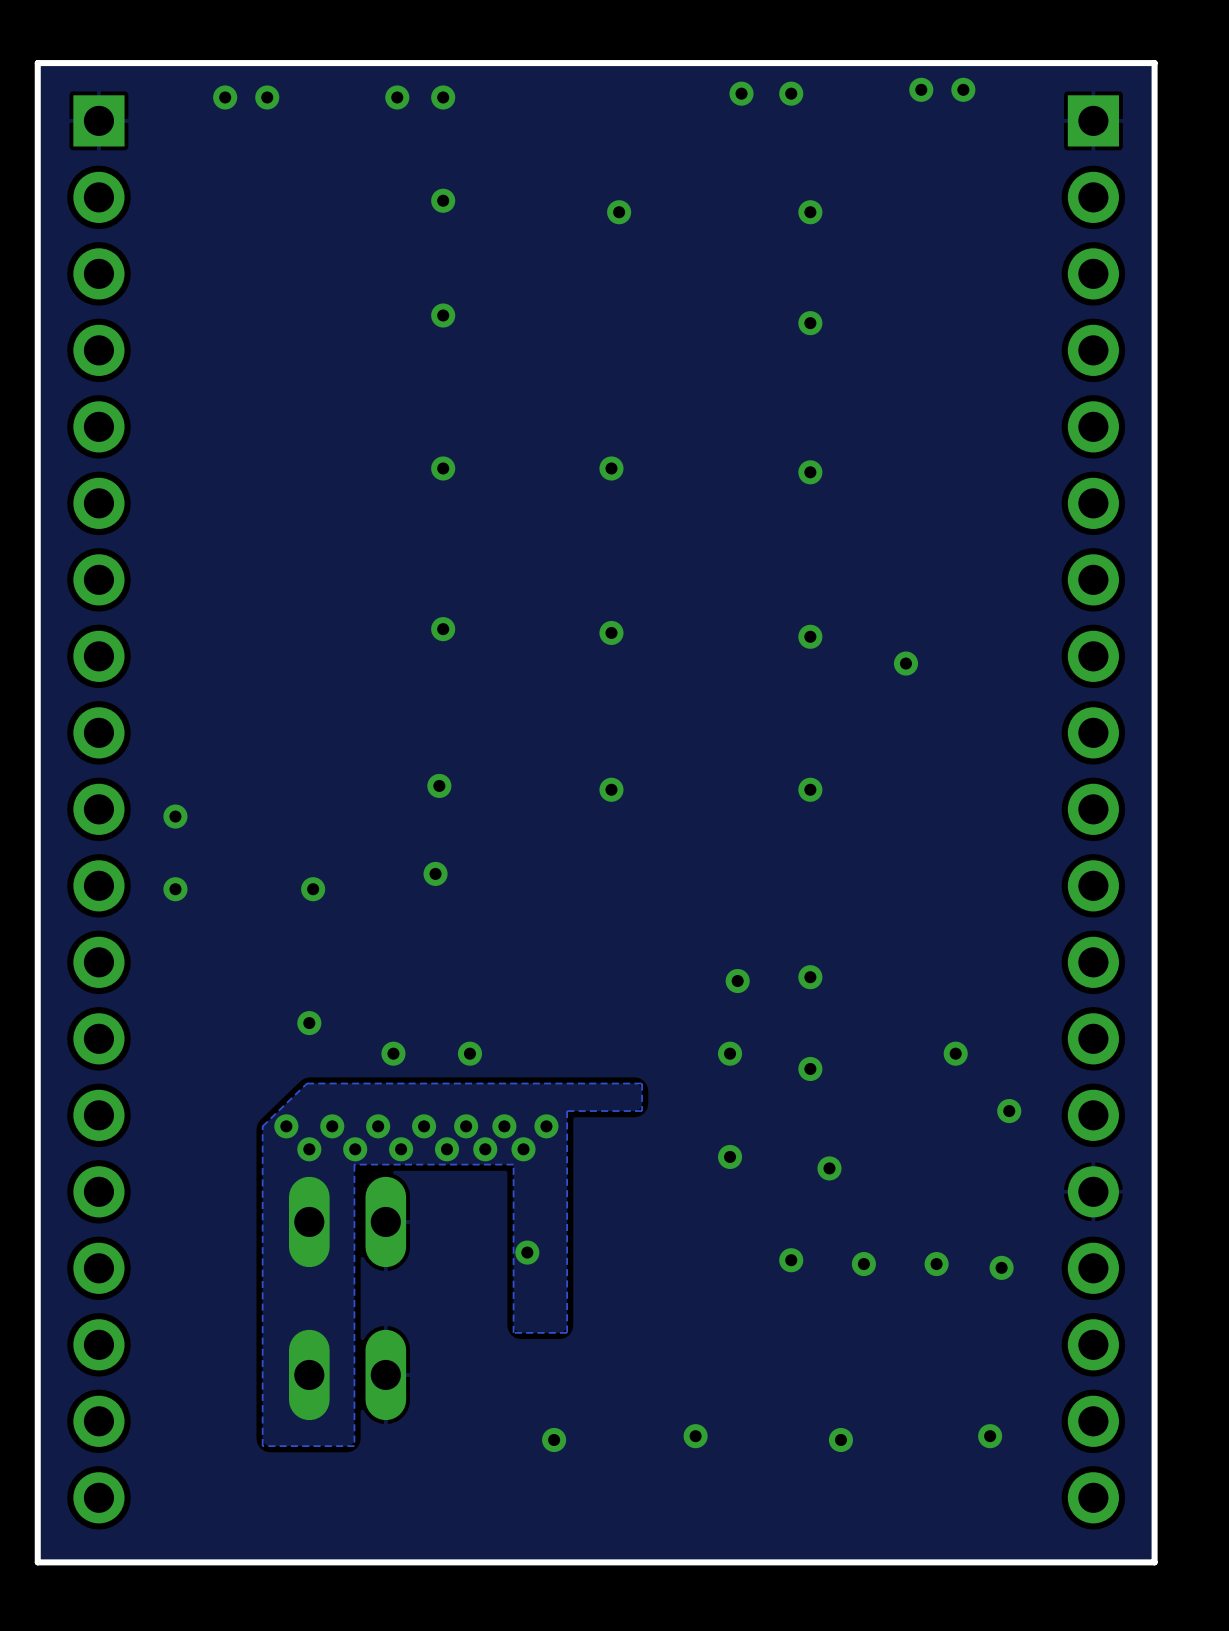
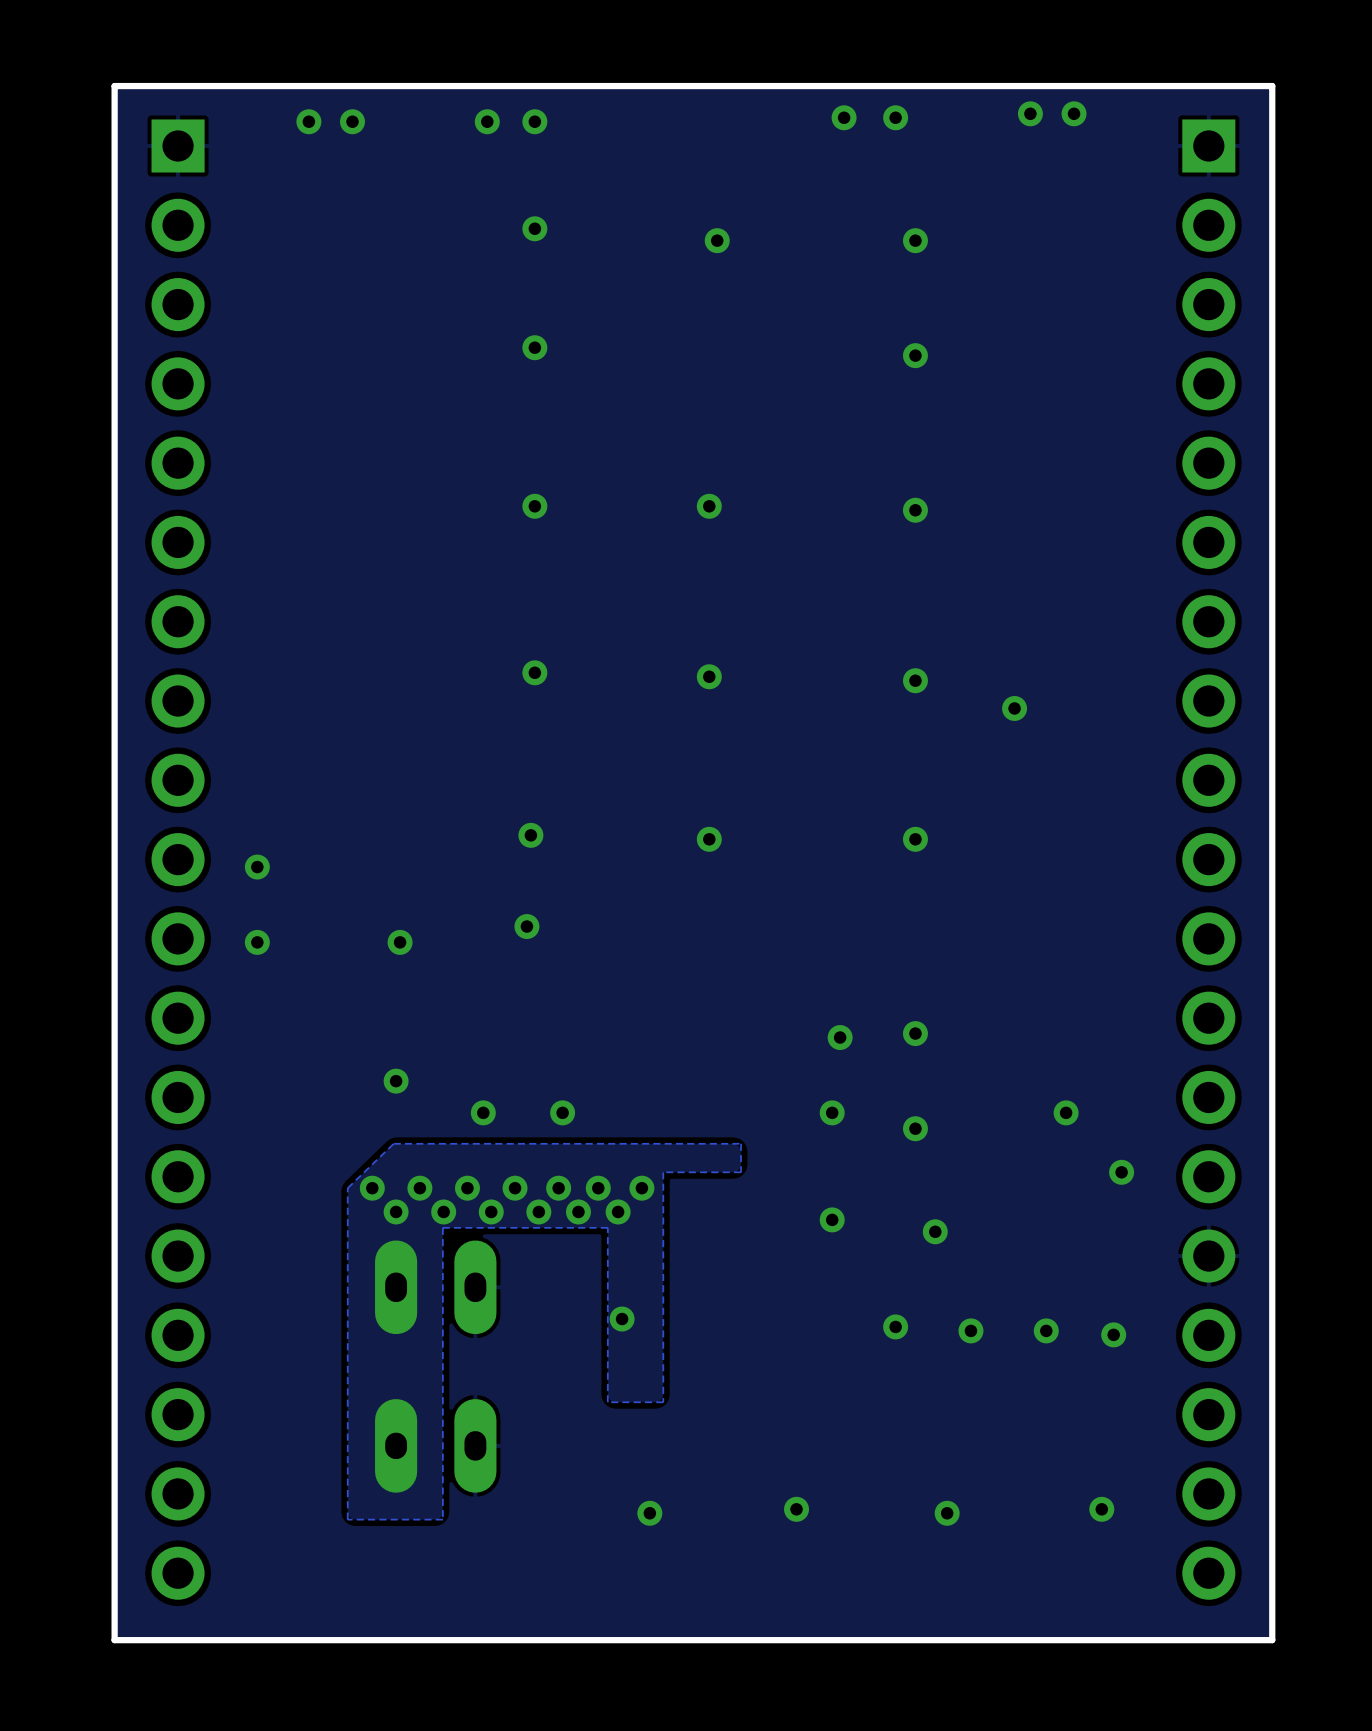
part footprint: [288, 1176, 407, 1421] -> [375, 1240, 497, 1493]

